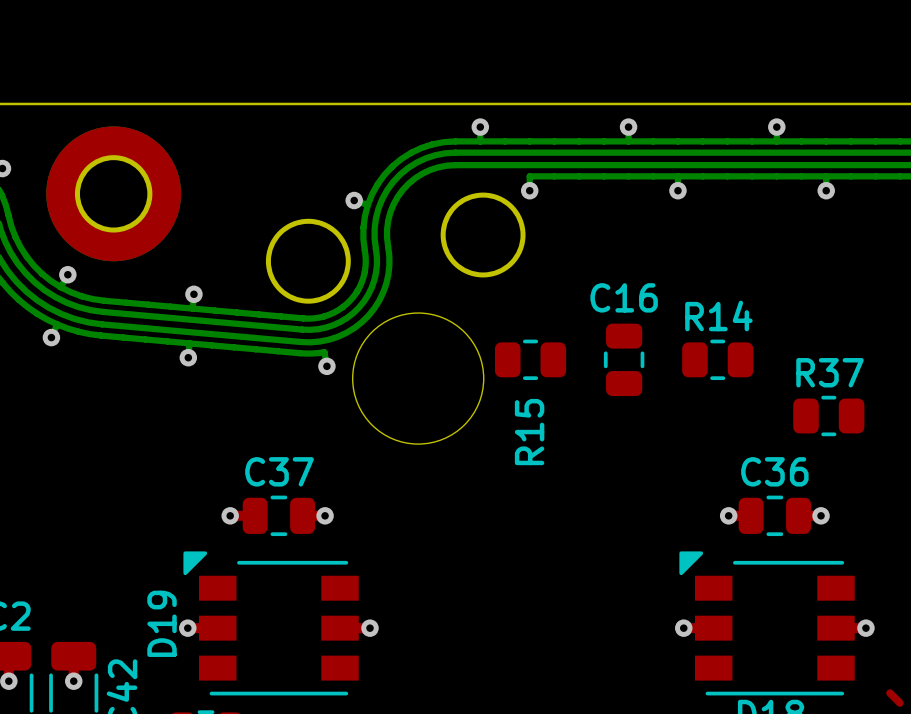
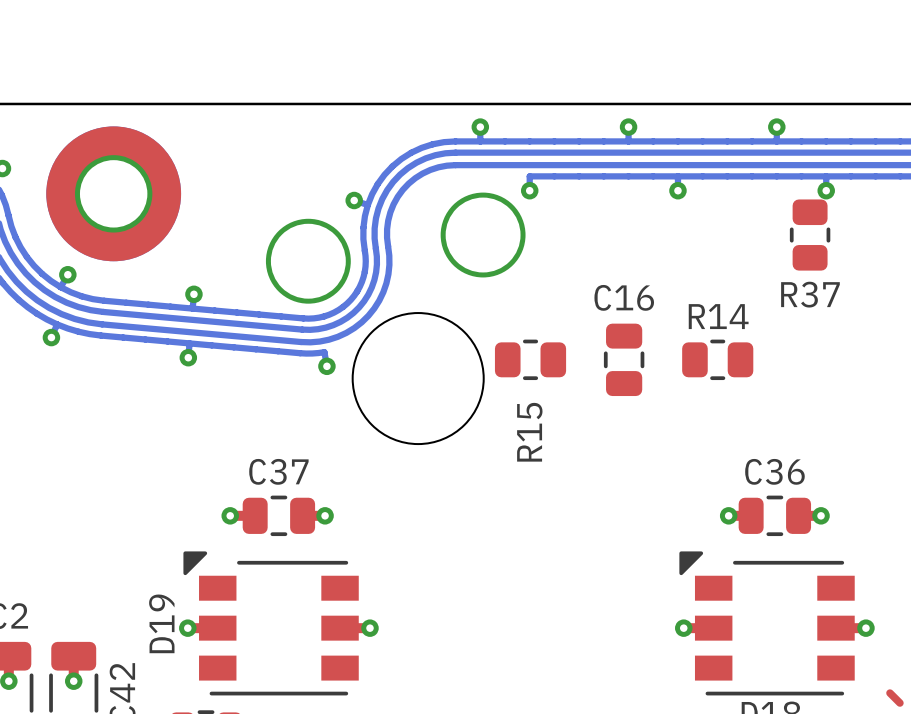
text position: R37 (829, 372) -> R37 (810, 294)
part rotation: 0° (828, 415) -> 90° clockwise (810, 235)
part position: (828, 415) -> (810, 235)

